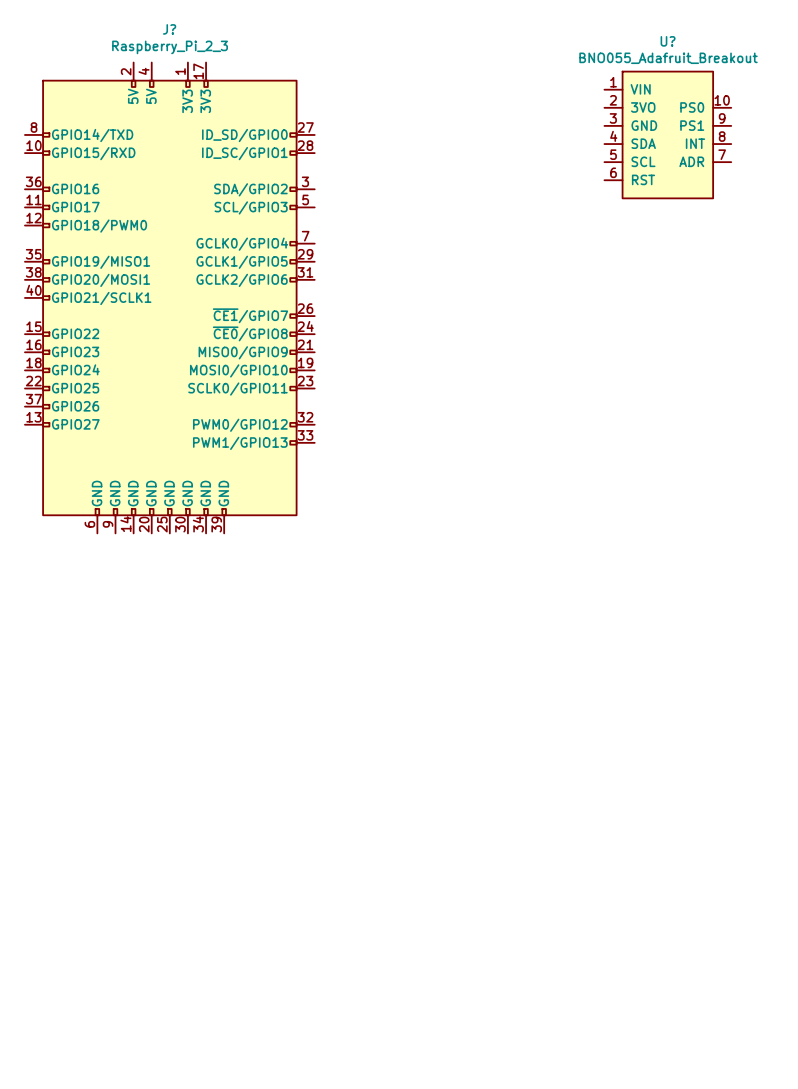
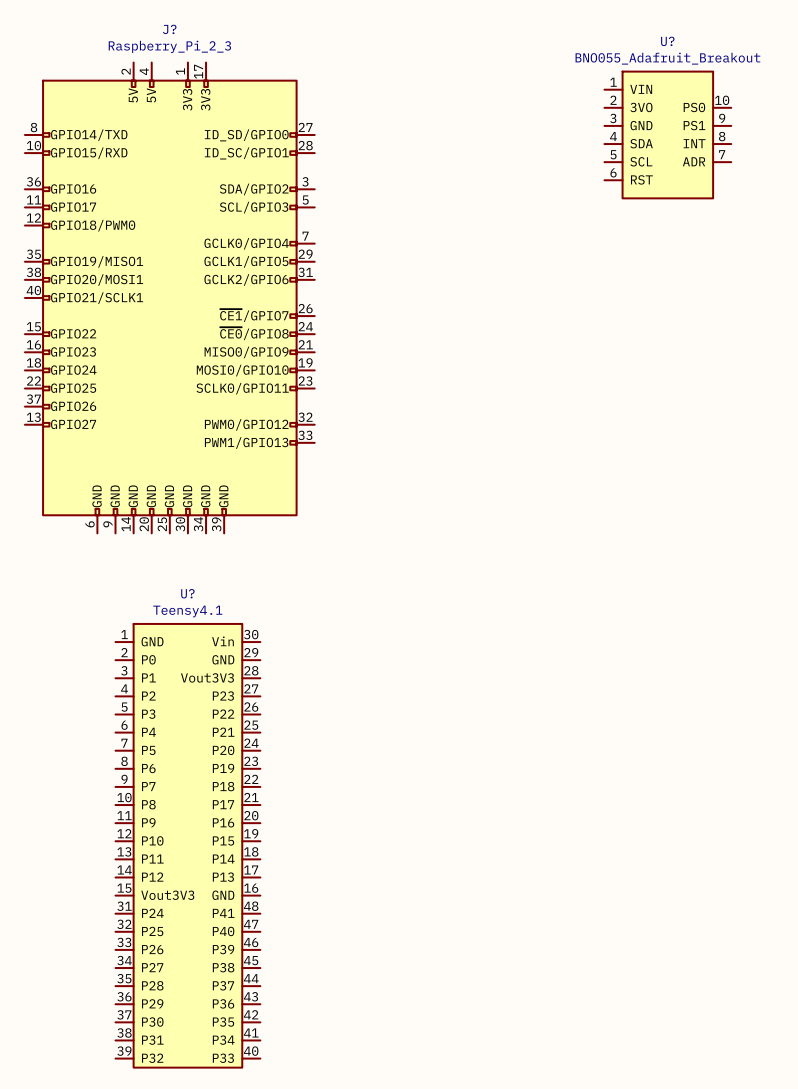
U?: none -> Teensy4.1 (187, 845)

